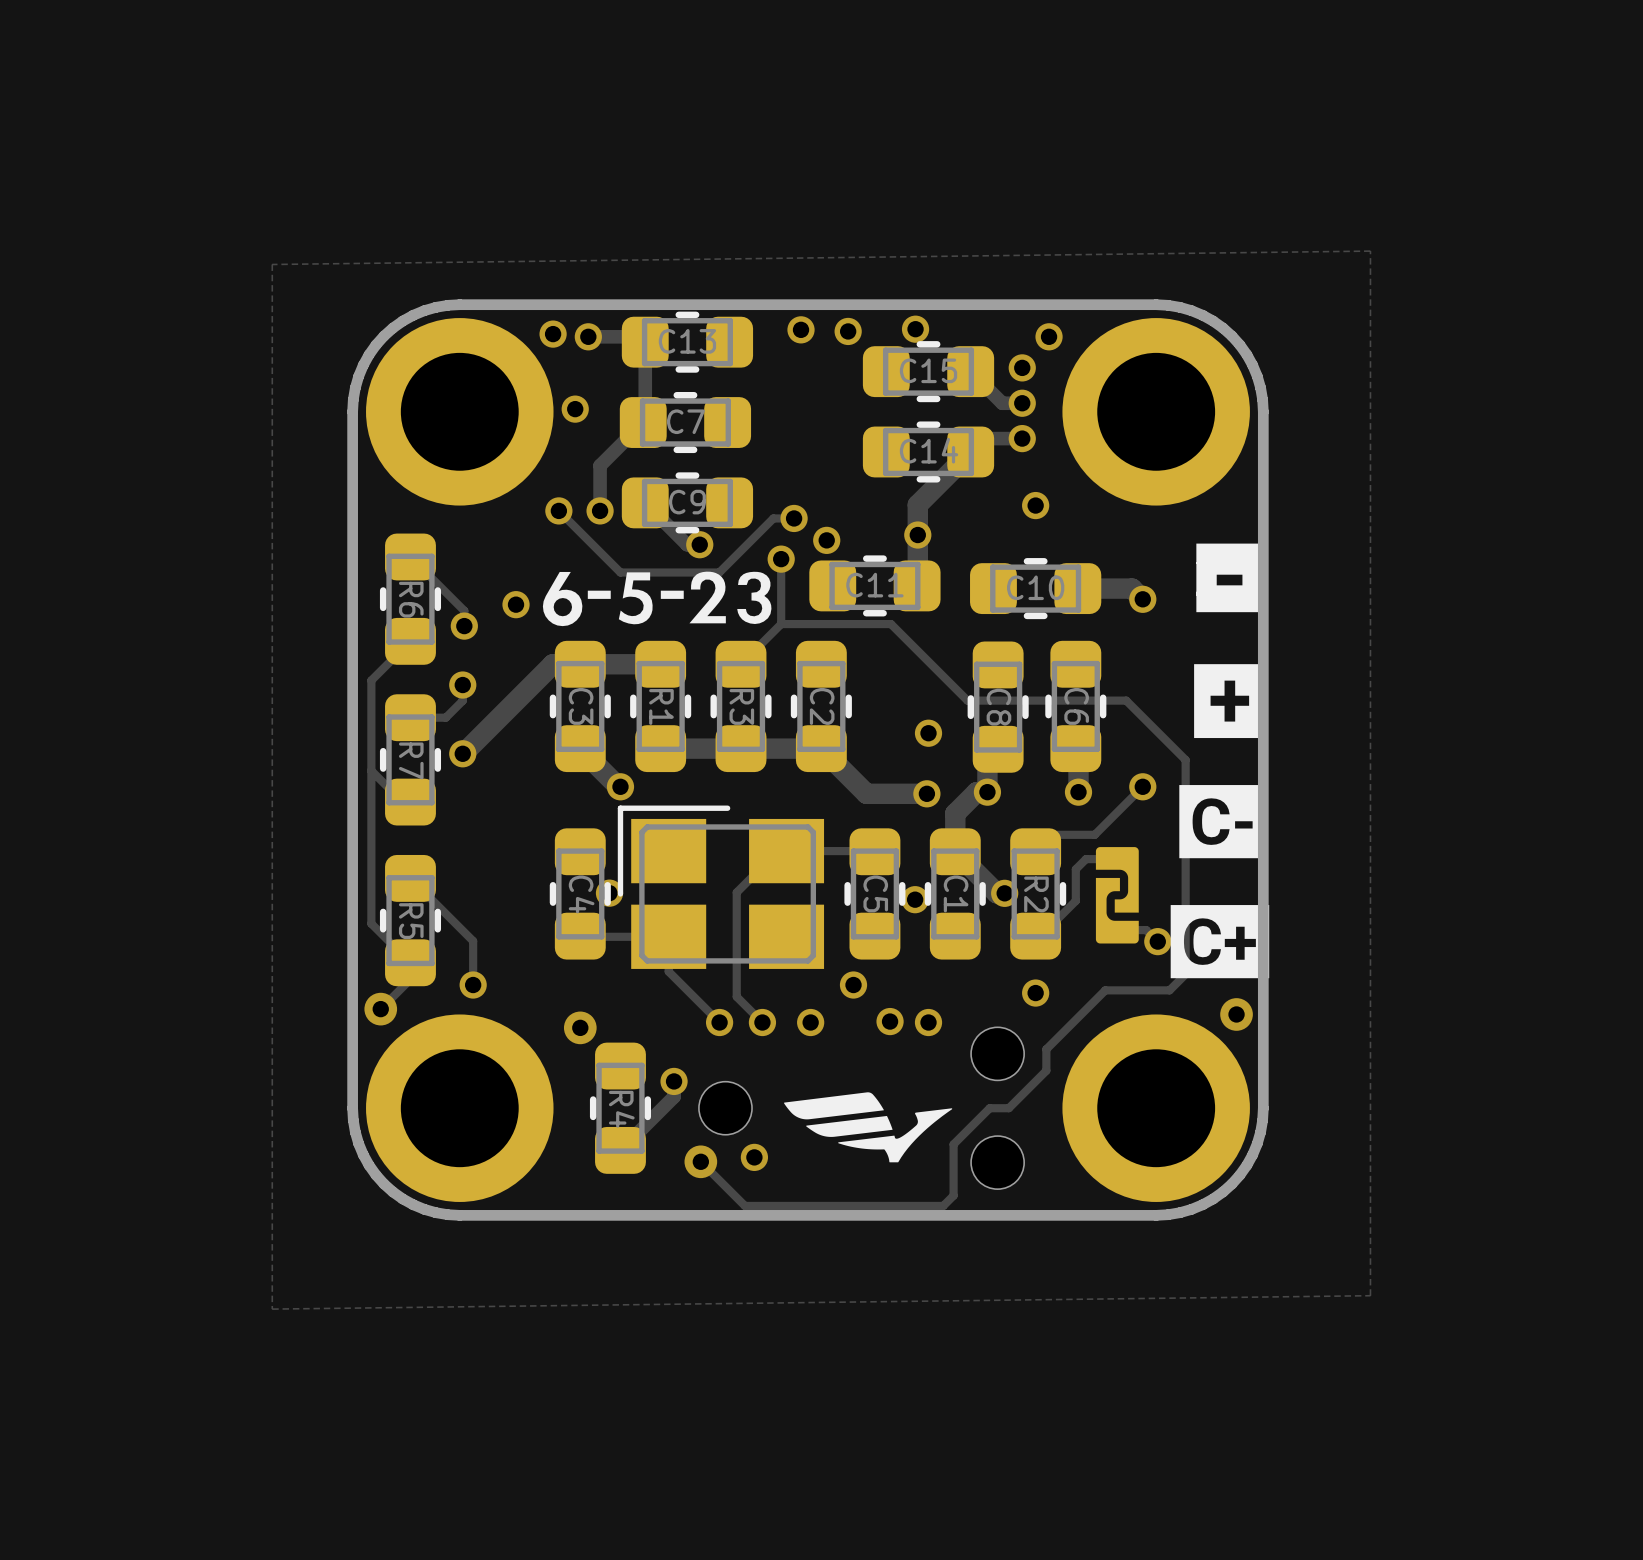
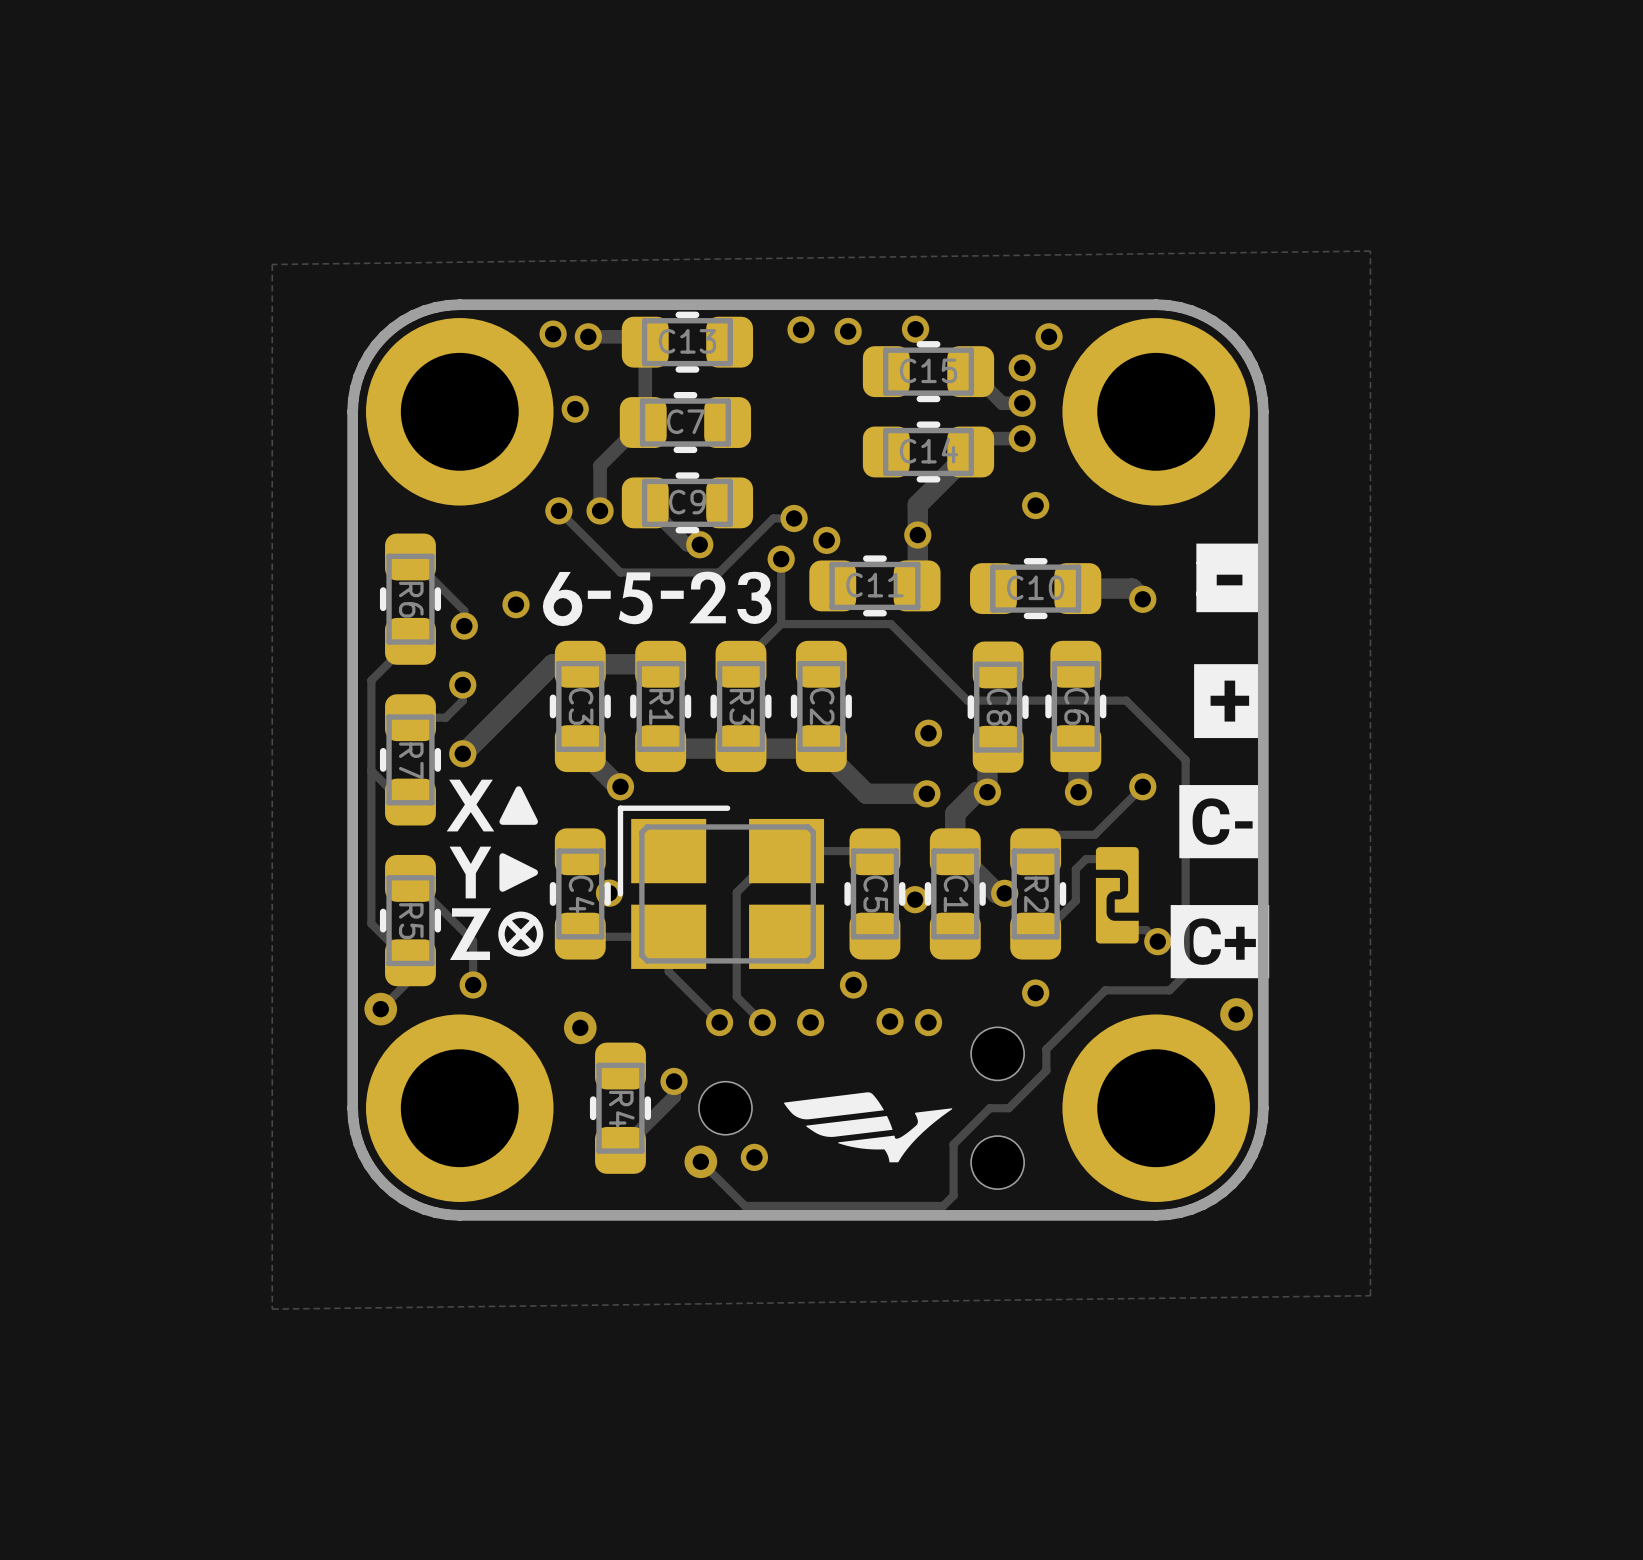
drawing: none -> [446, 779, 544, 961]
line: none -> (507, 920) (534, 947)
line: none -> (534, 920) (507, 947)

